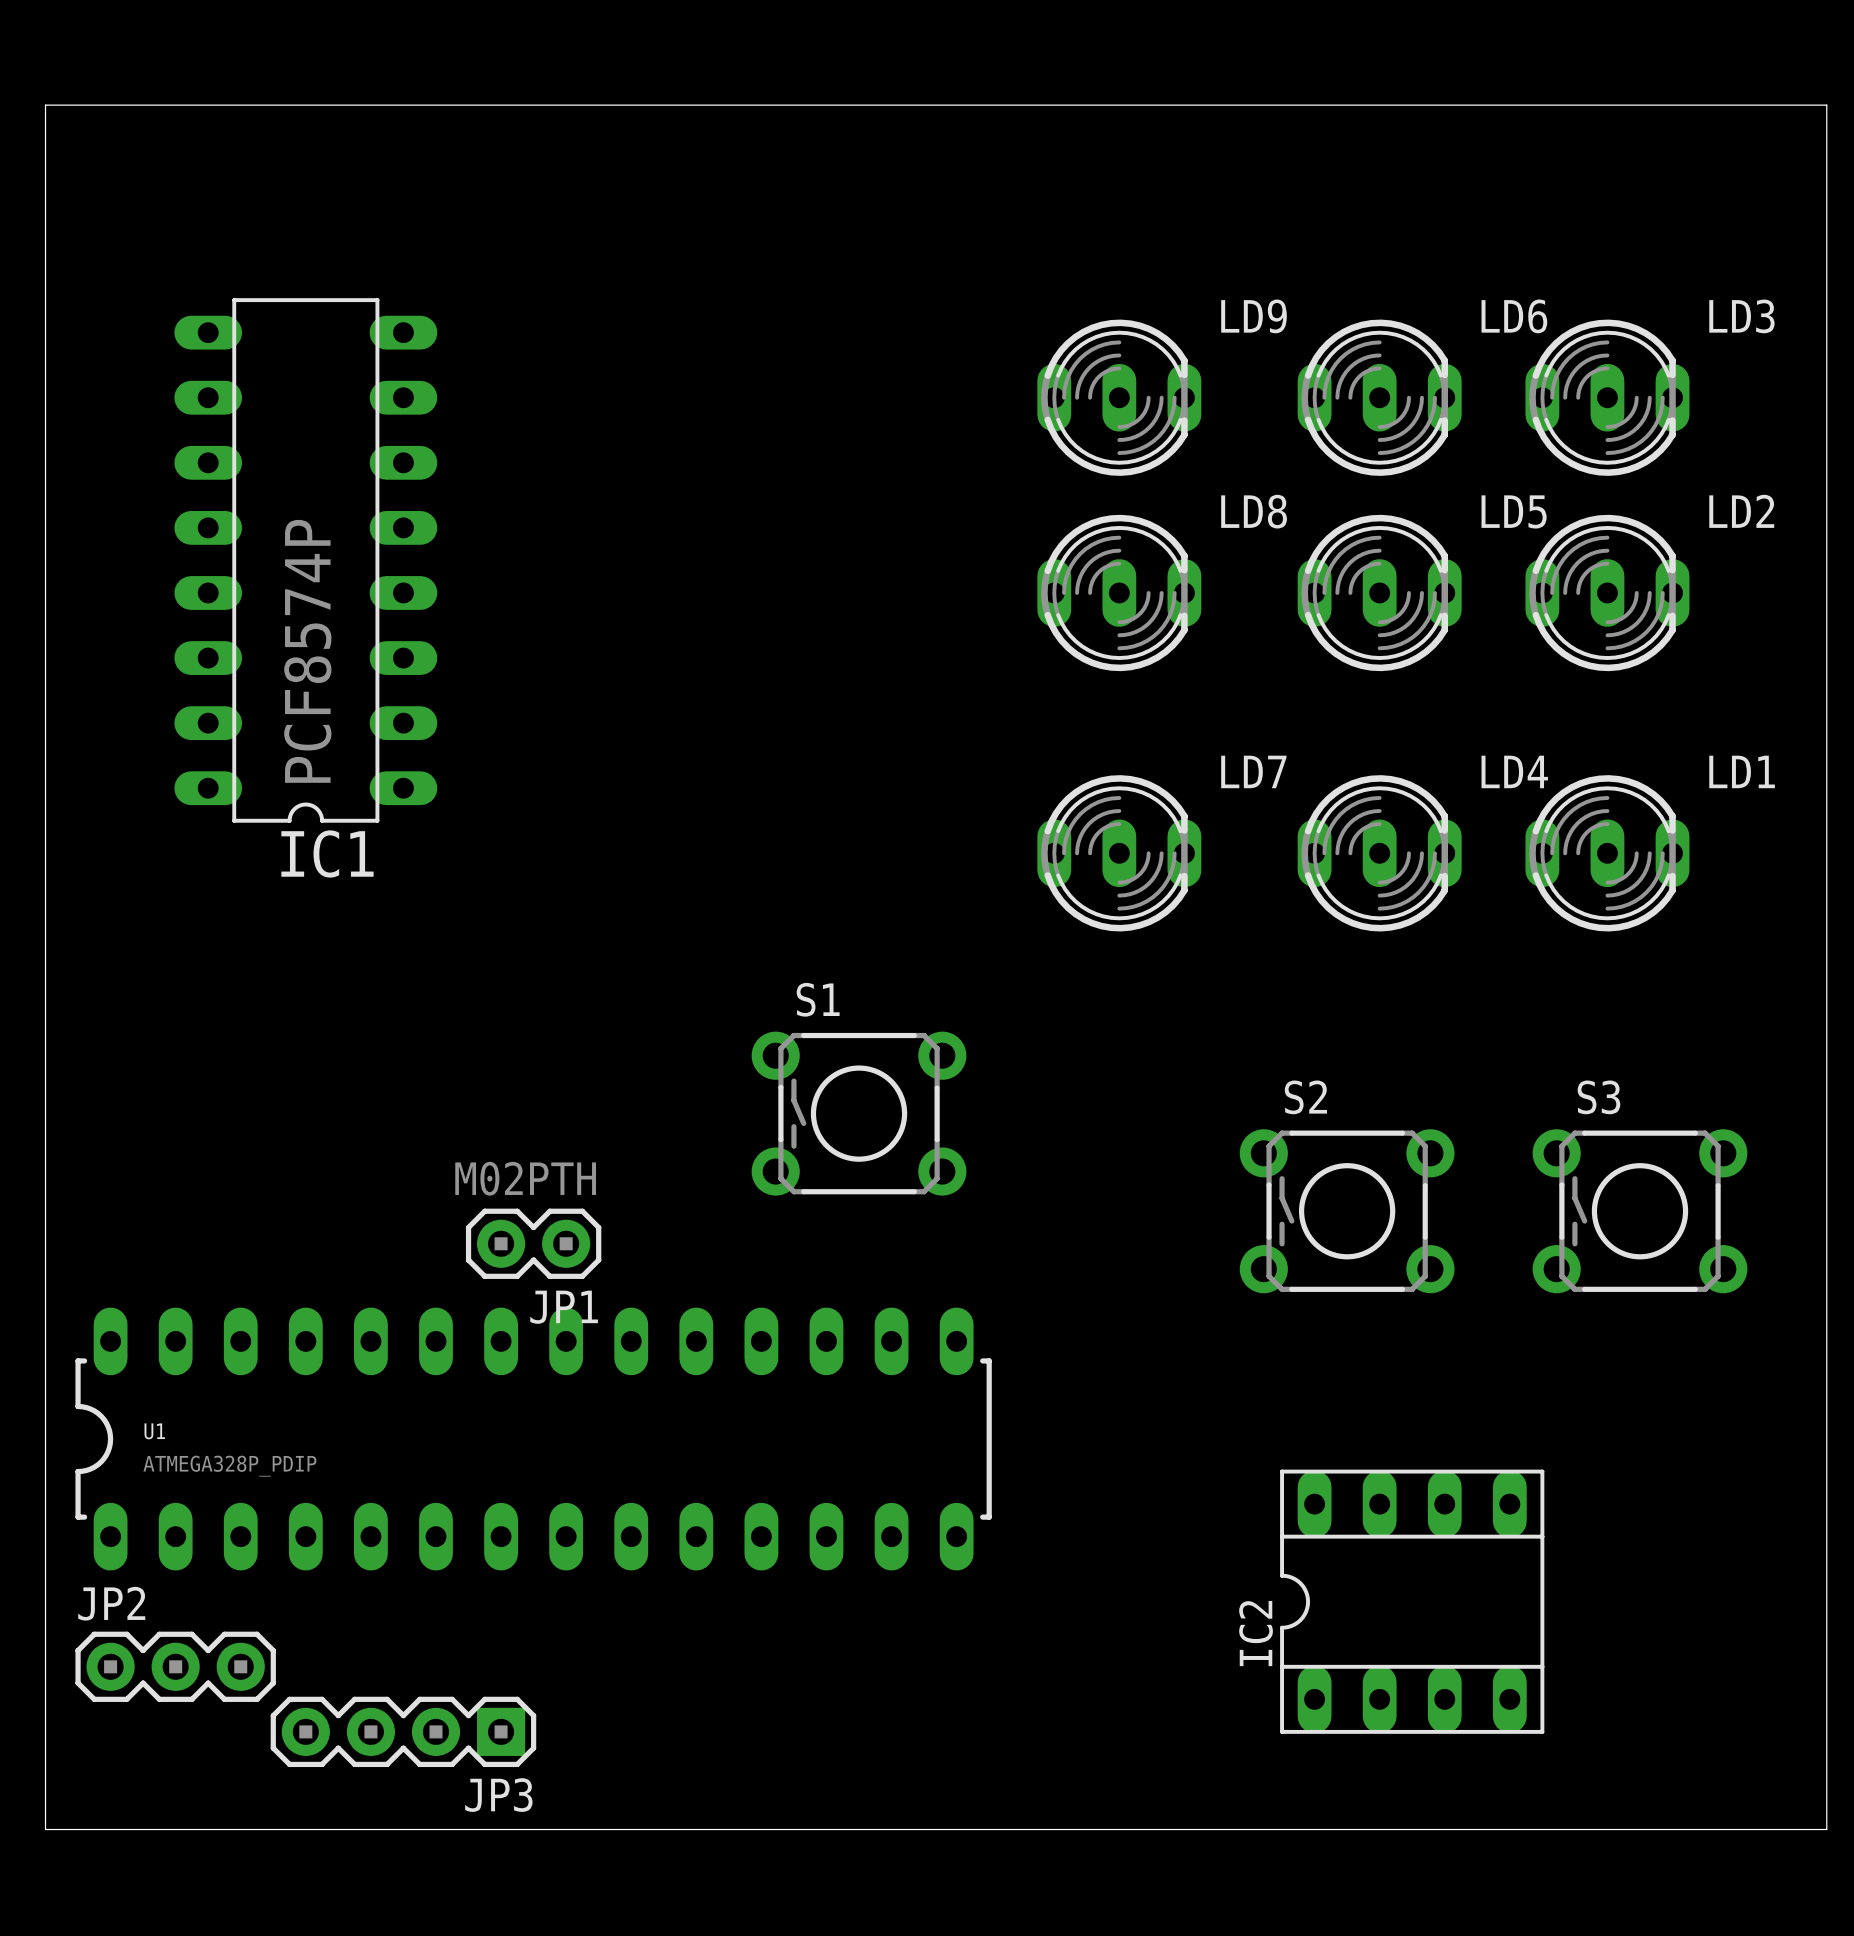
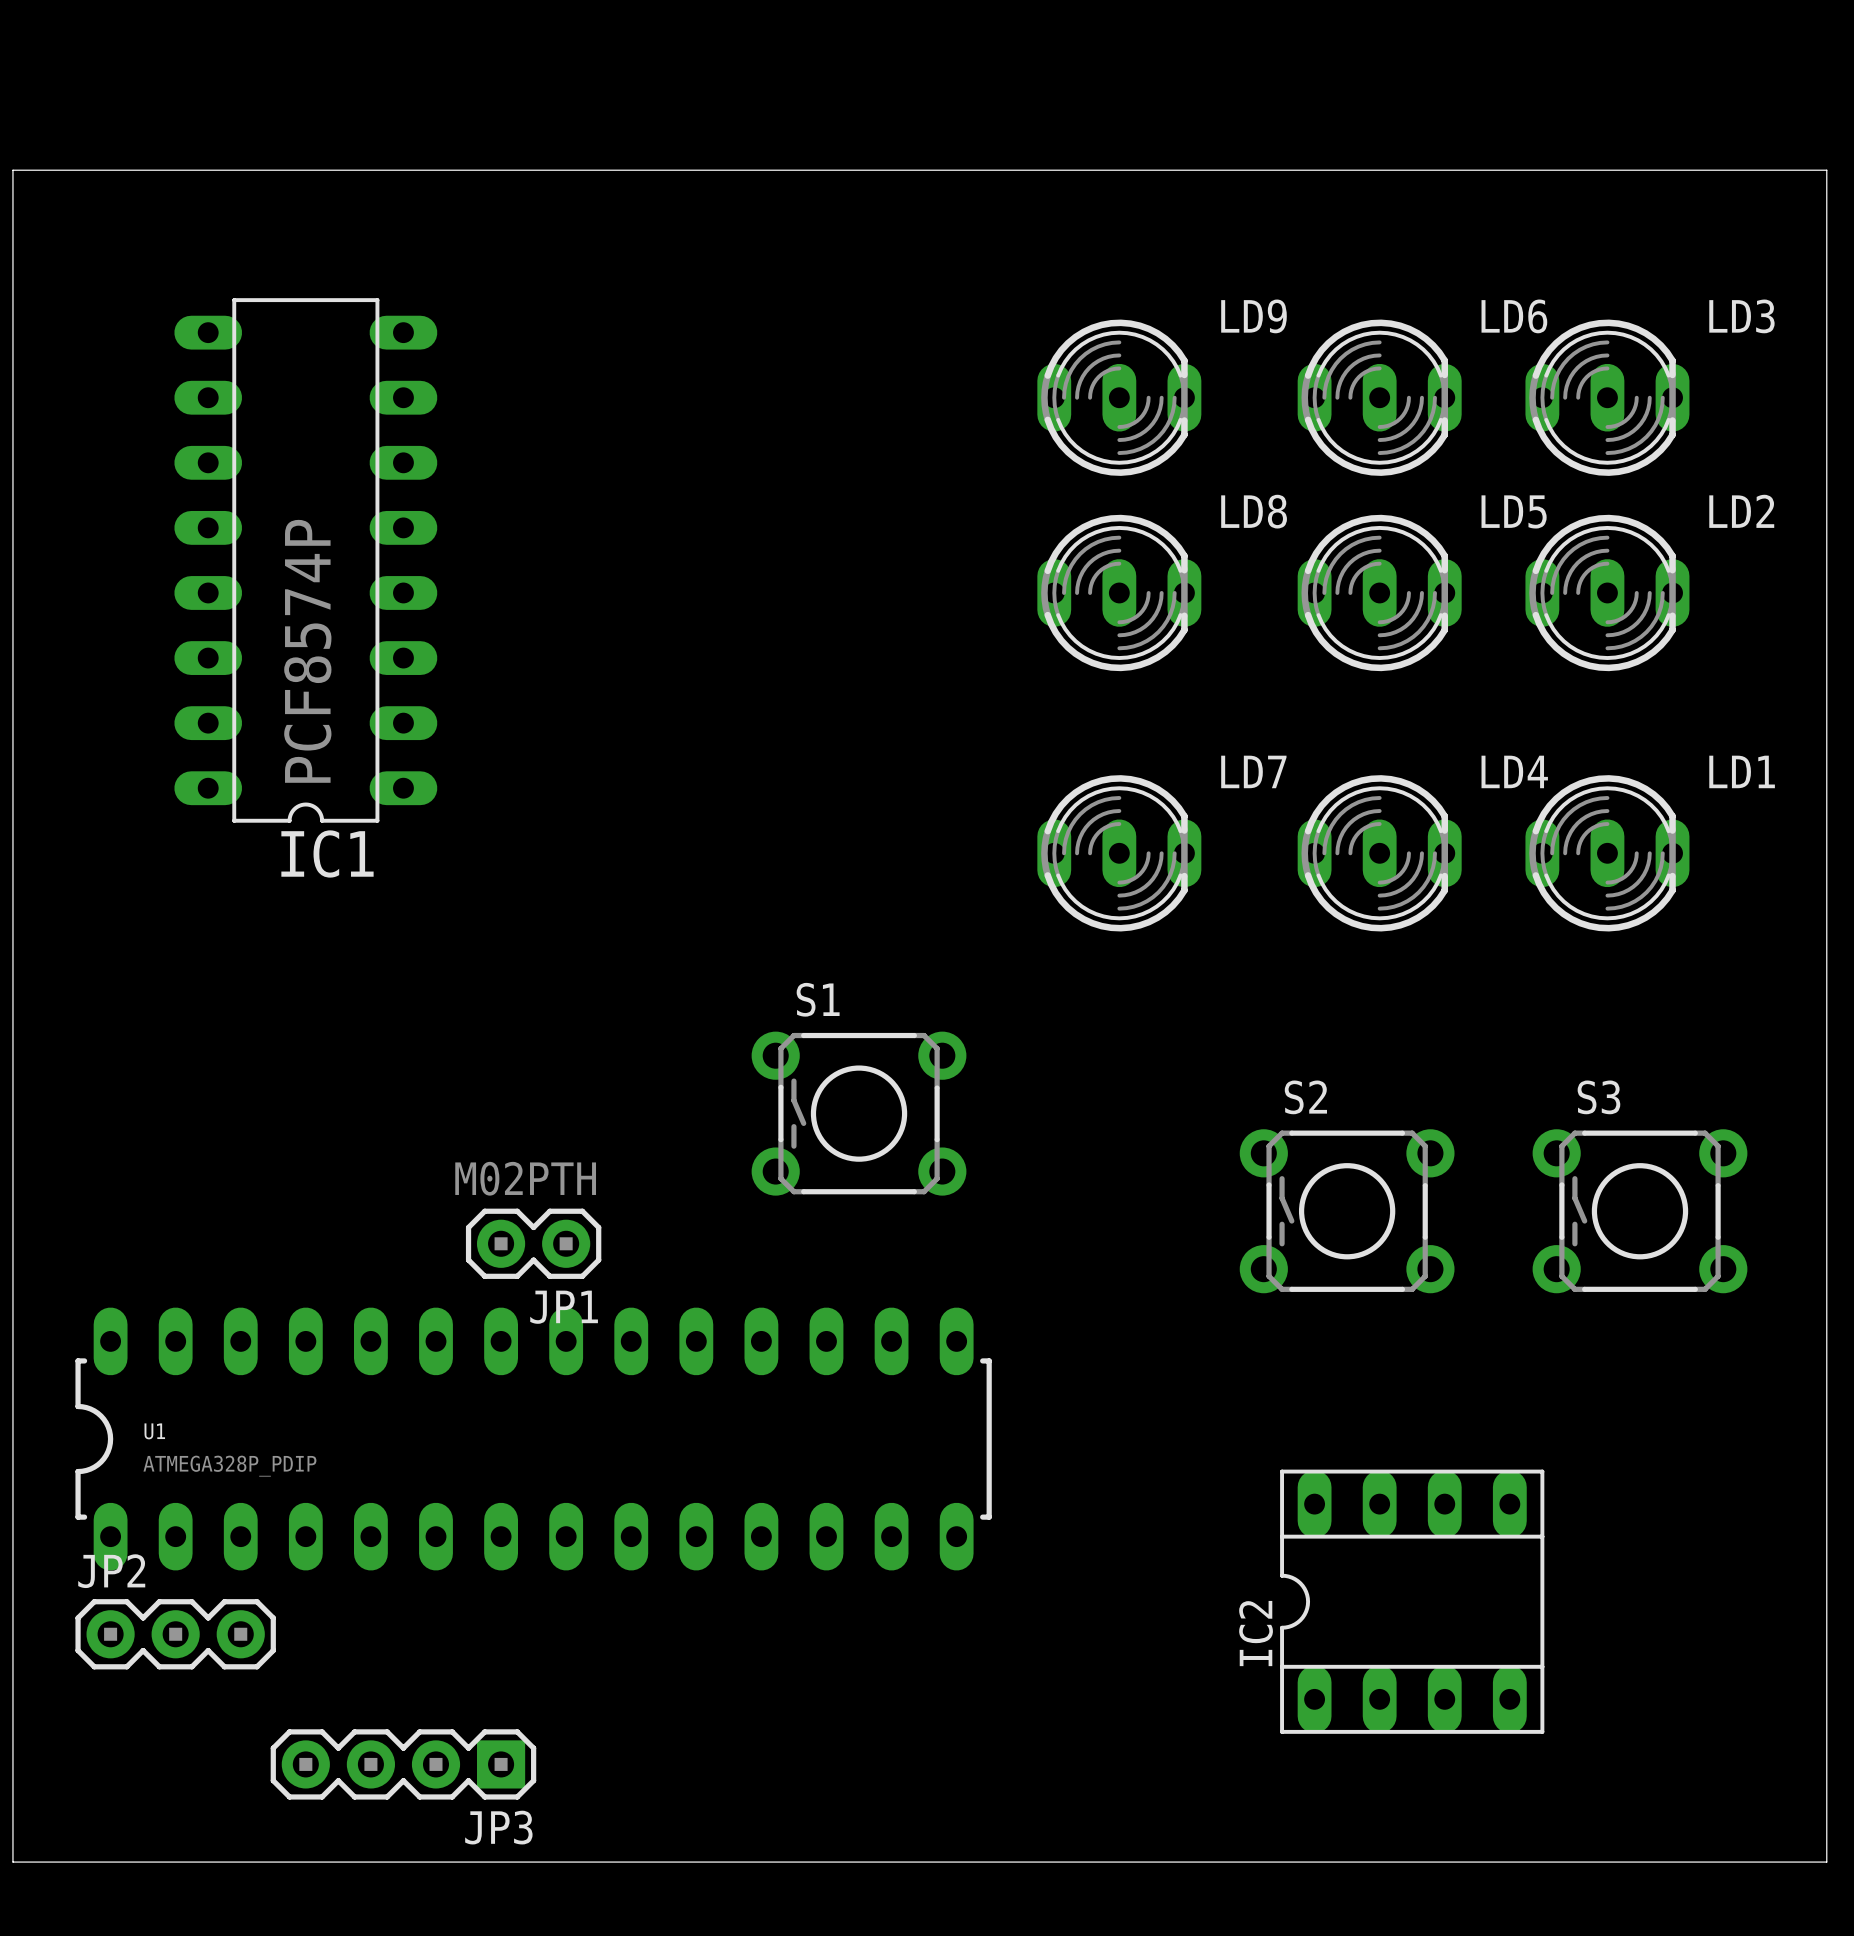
board edge: (1826, 170) (1826, 105) (45, 105) (45, 1829) (1826, 1829) -> (1826, 170) (12, 170) (12, 1862) (1826, 1862) (1826, 1829)
JP2 position: (175, 1666) -> (175, 1634)
JP3 position: (403, 1731) -> (403, 1764)

